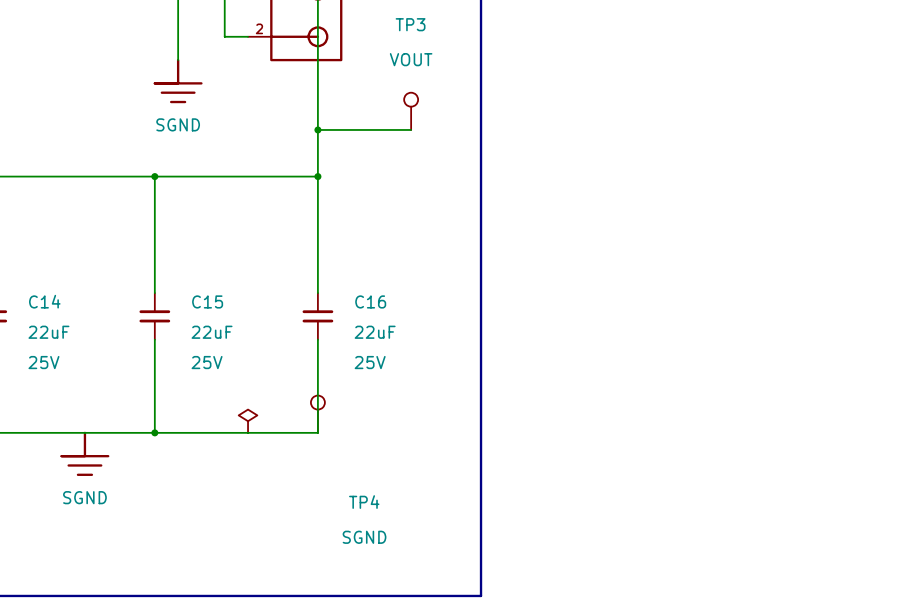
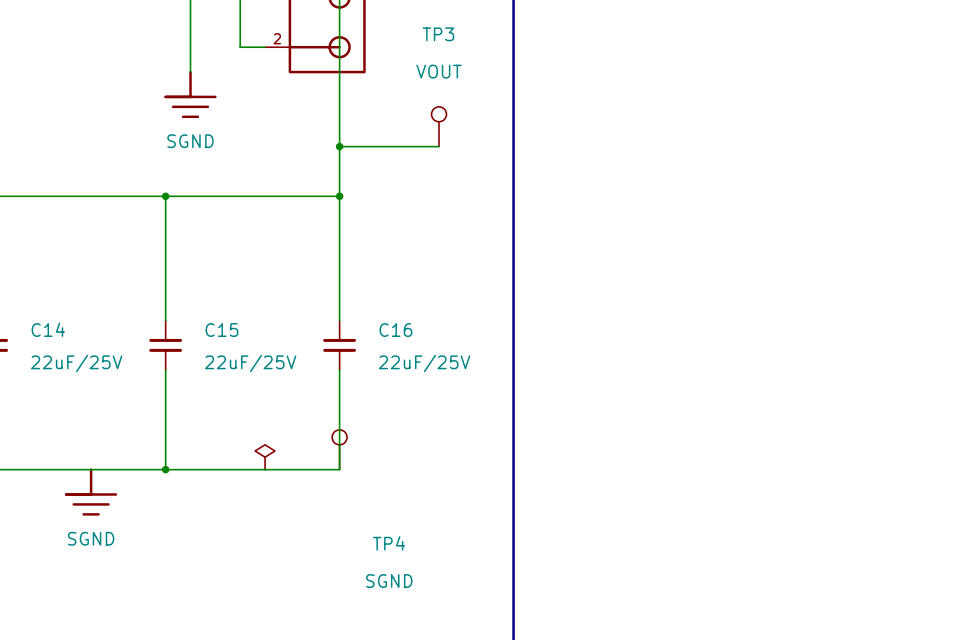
C14 value: 22uF (48, 332) -> 22uF/25V (76, 363)
C15 value: 22uF (212, 332) -> 22uF/25V (250, 363)
C16 value: 22uF (375, 332) -> 22uF/25V (424, 363)
C14 text: 25V (43, 362) -> none
C15 text: 25V (207, 362) -> none
C16 text: 25V (370, 362) -> none

